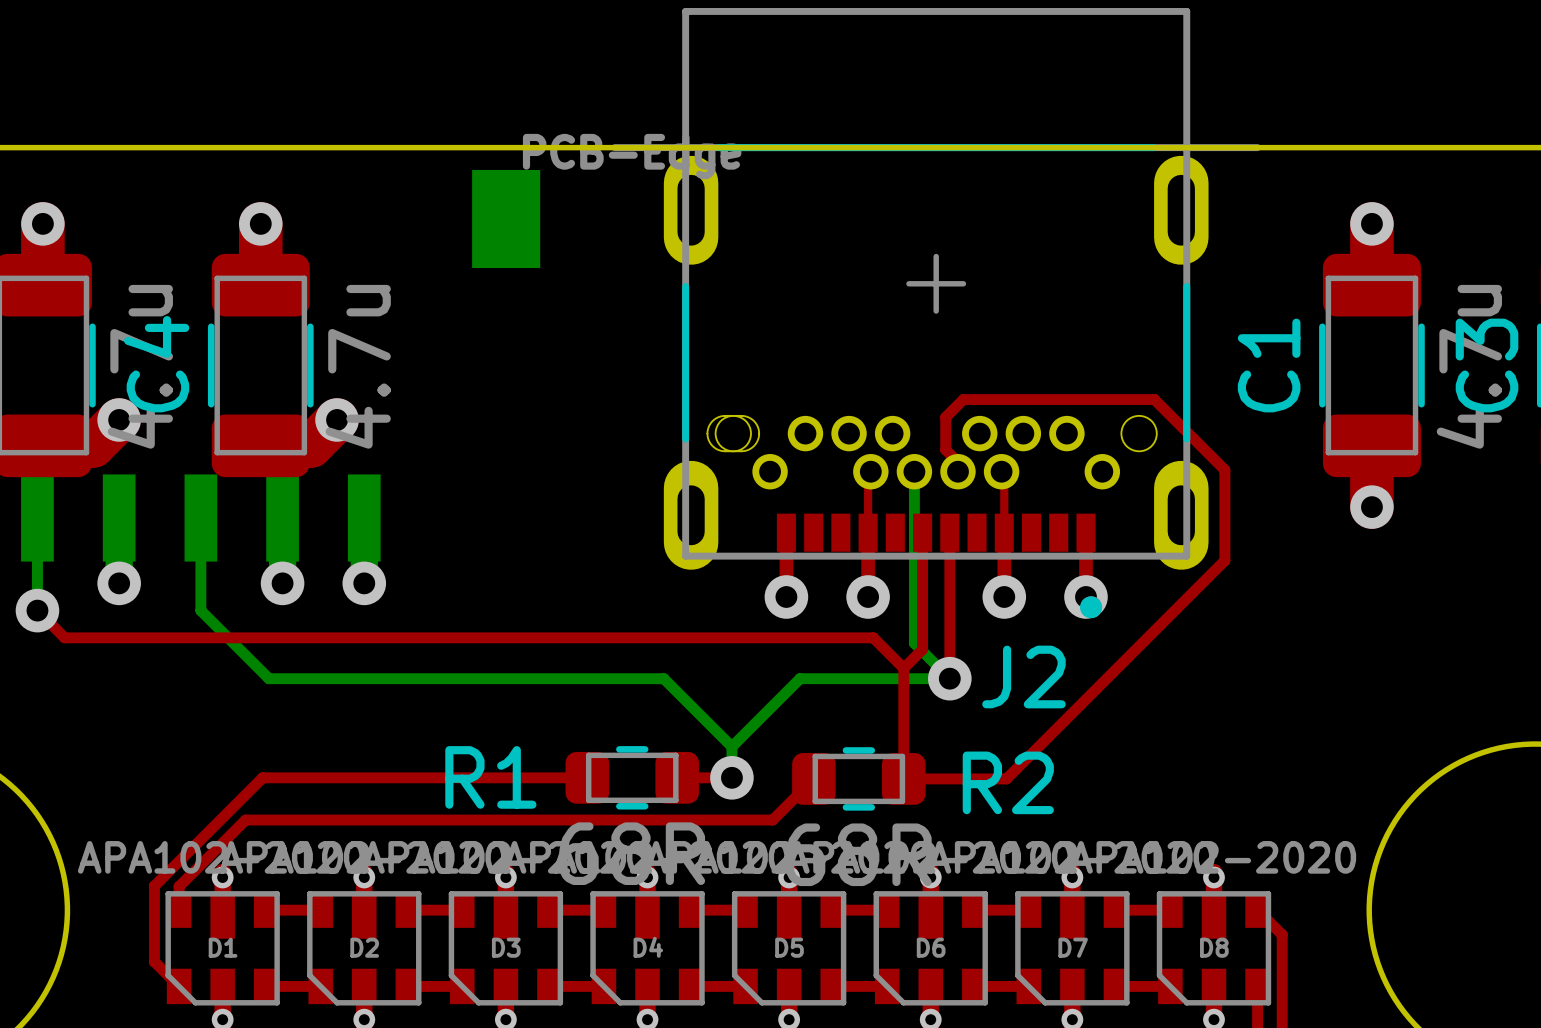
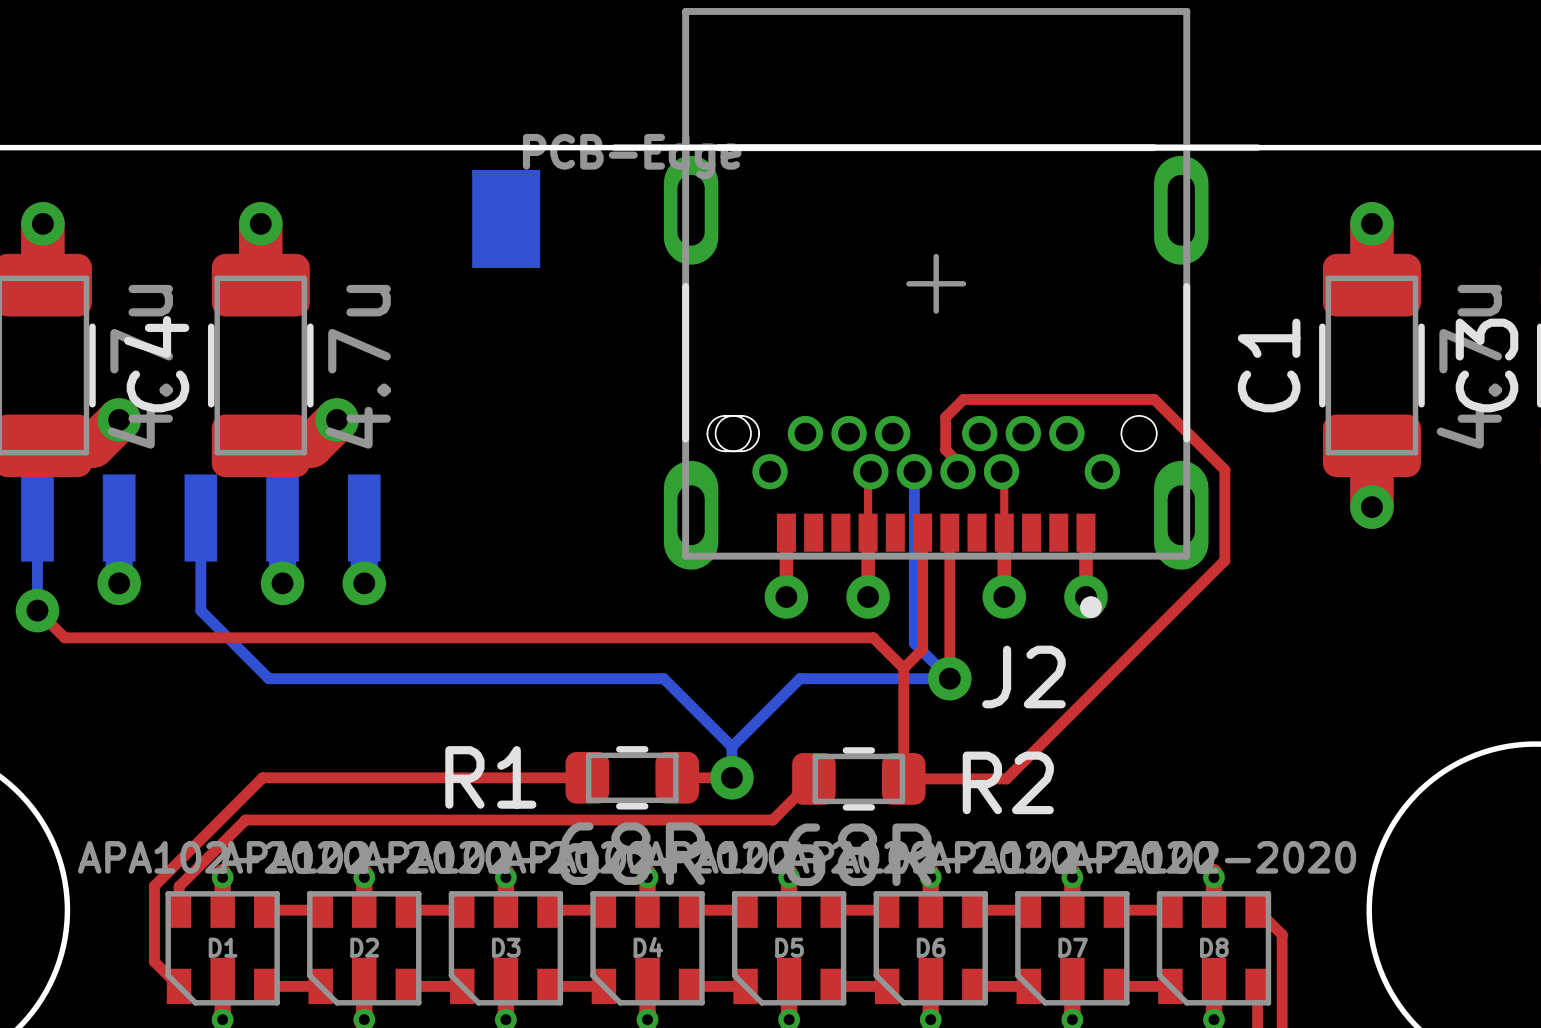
D1 footprint: [165, 891, 280, 1006] -> [165, 891, 280, 1006]
D2 footprint: [307, 891, 422, 1006] -> [307, 891, 422, 1006]
D3 footprint: [448, 891, 564, 1006] -> [448, 891, 564, 1006]
D4 footprint: [590, 891, 705, 1006] -> [590, 891, 705, 1006]
D5 footprint: [731, 891, 847, 1006] -> [731, 891, 847, 1006]
D6 footprint: [873, 891, 988, 1006] -> [873, 891, 988, 1006]
D7 footprint: [1015, 891, 1130, 1006] -> [1015, 891, 1130, 1006]
D8 footprint: [1156, 891, 1272, 1006] -> [1156, 891, 1272, 1006]

